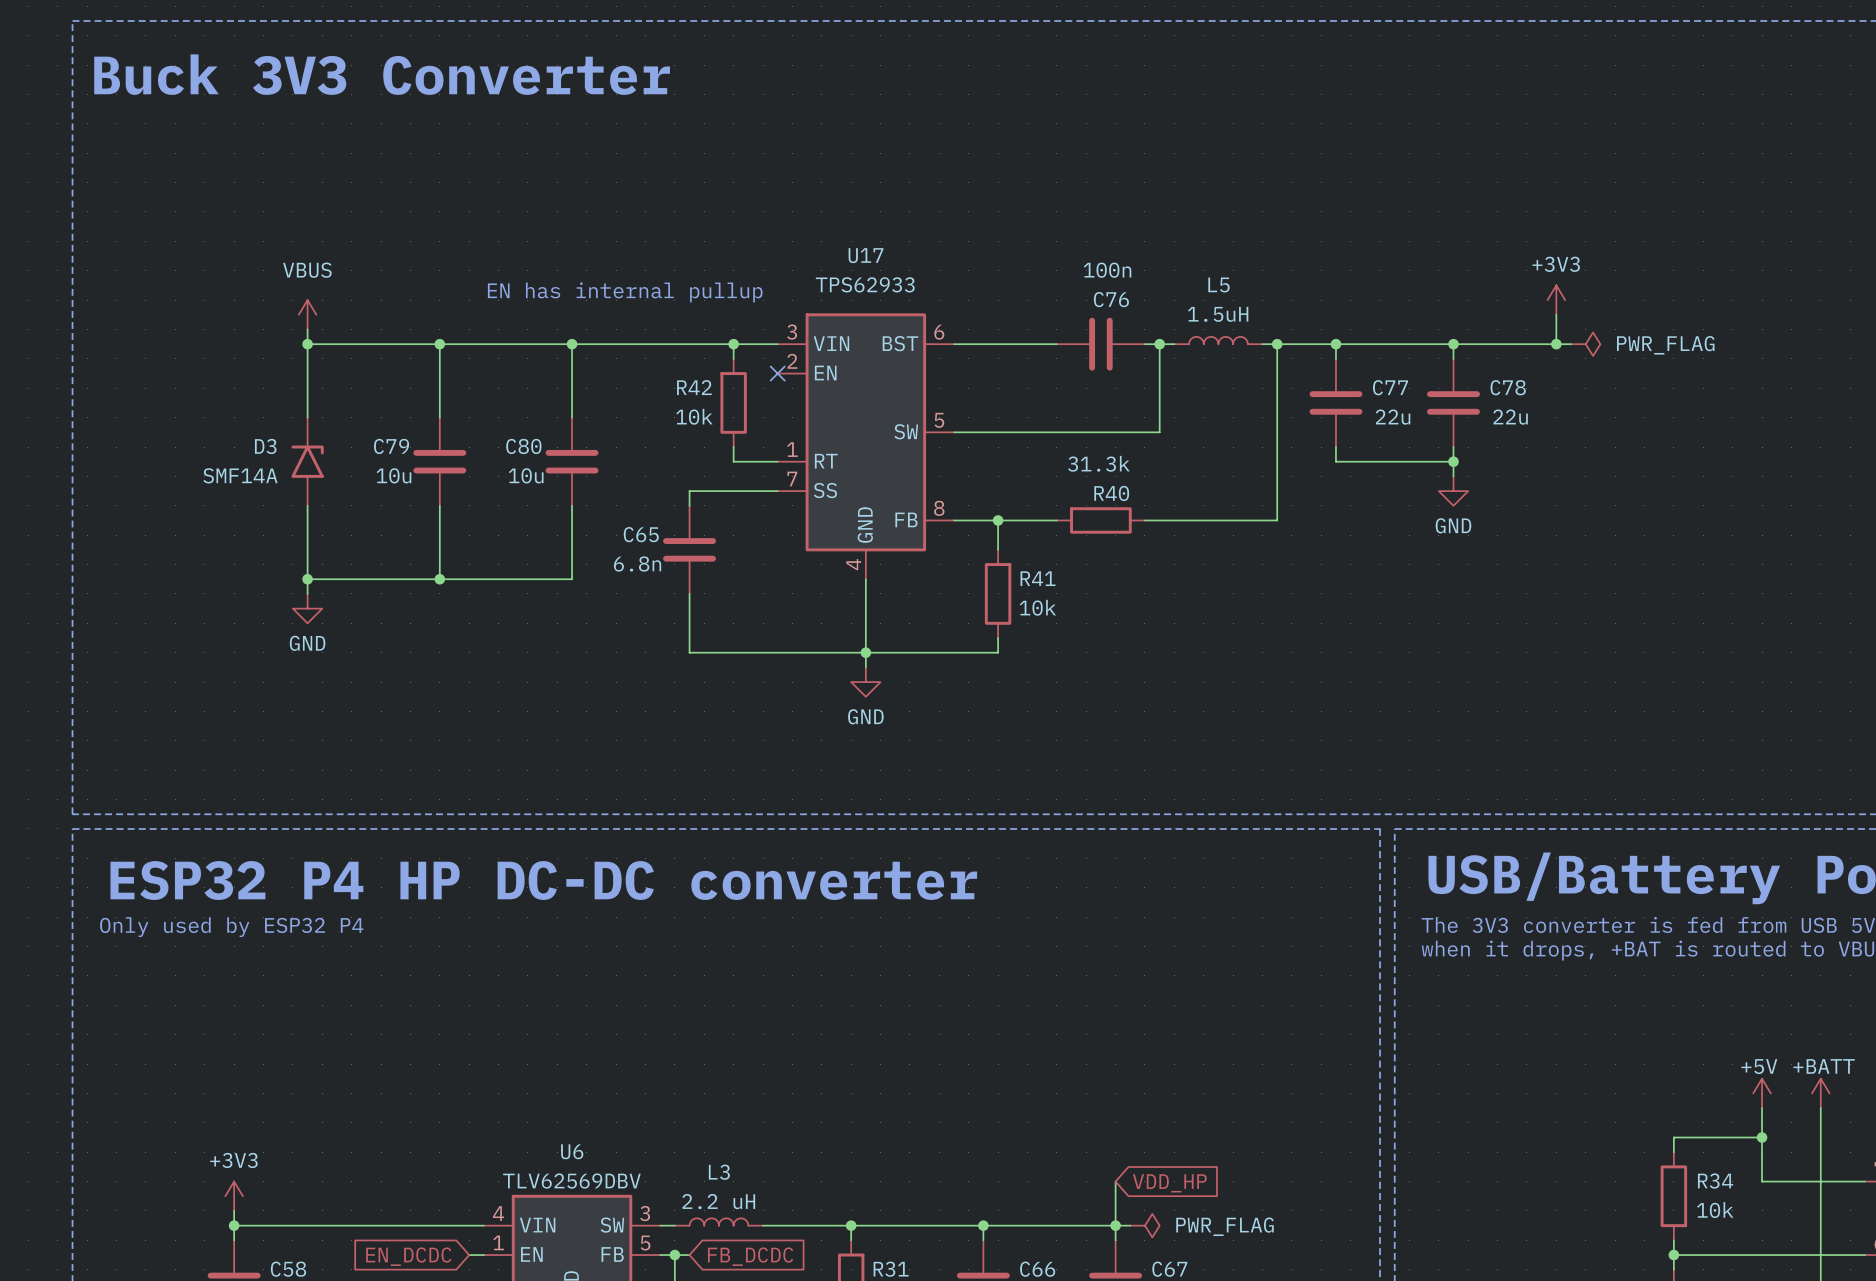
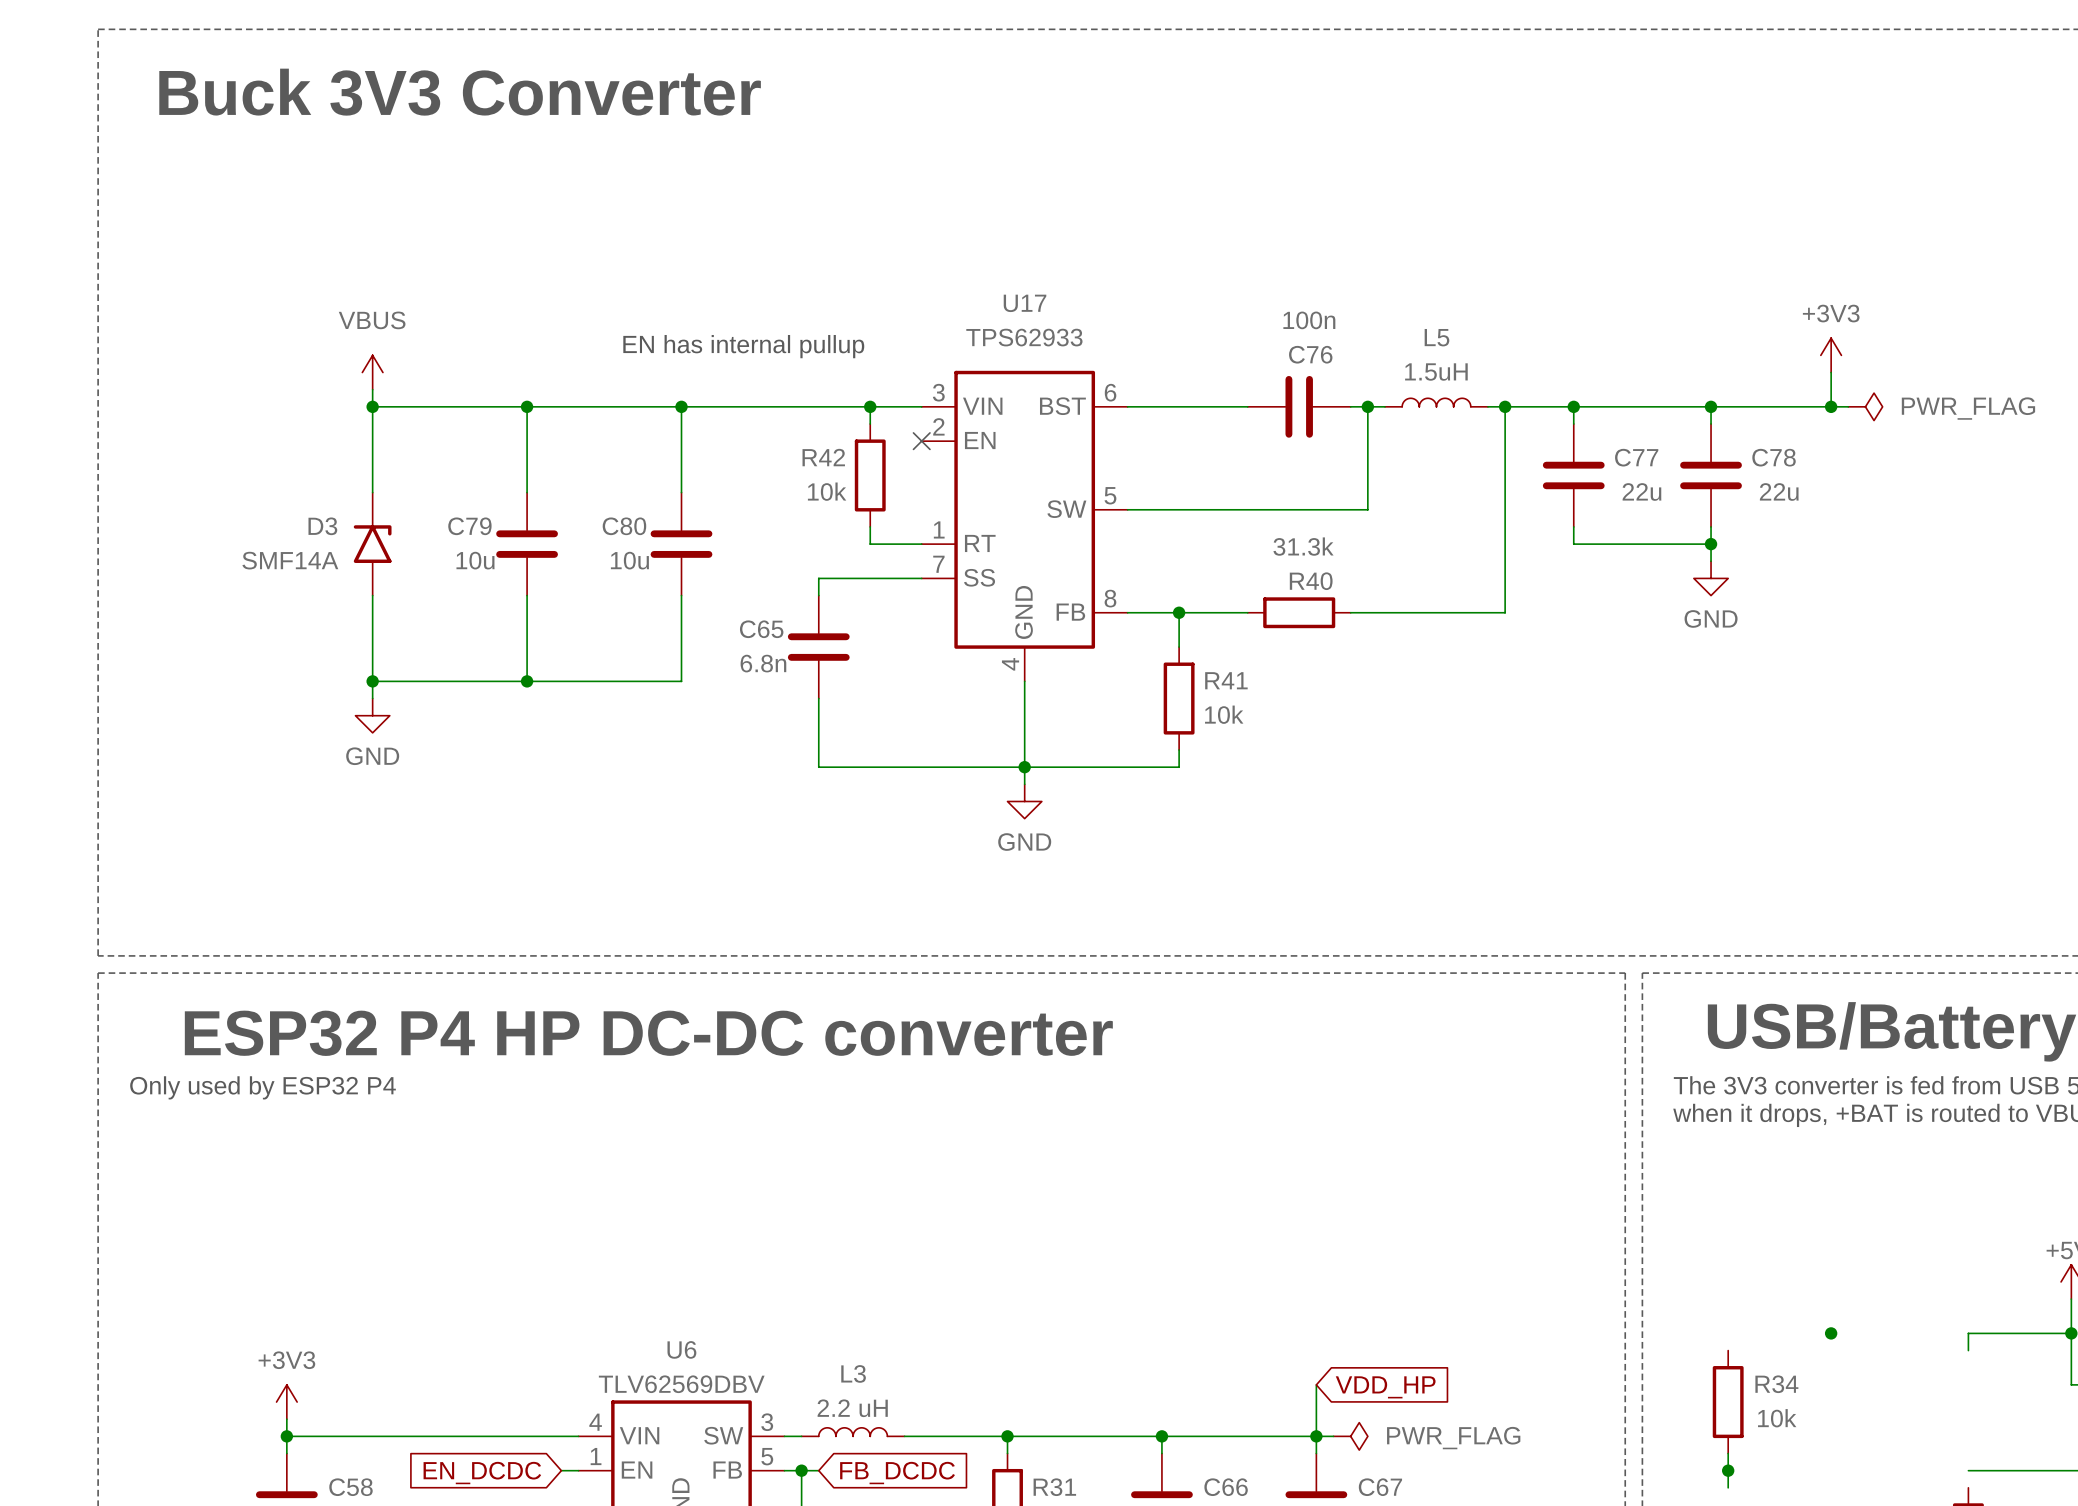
junction: none -> (1831, 1333)
R34 position: (1673, 1196) -> (1728, 1402)
wire: (1673, 1240) (1673, 1269) -> (1728, 1453) (1728, 1487)
junction: none -> (1728, 1470)
junction: (1673, 1255) -> none

